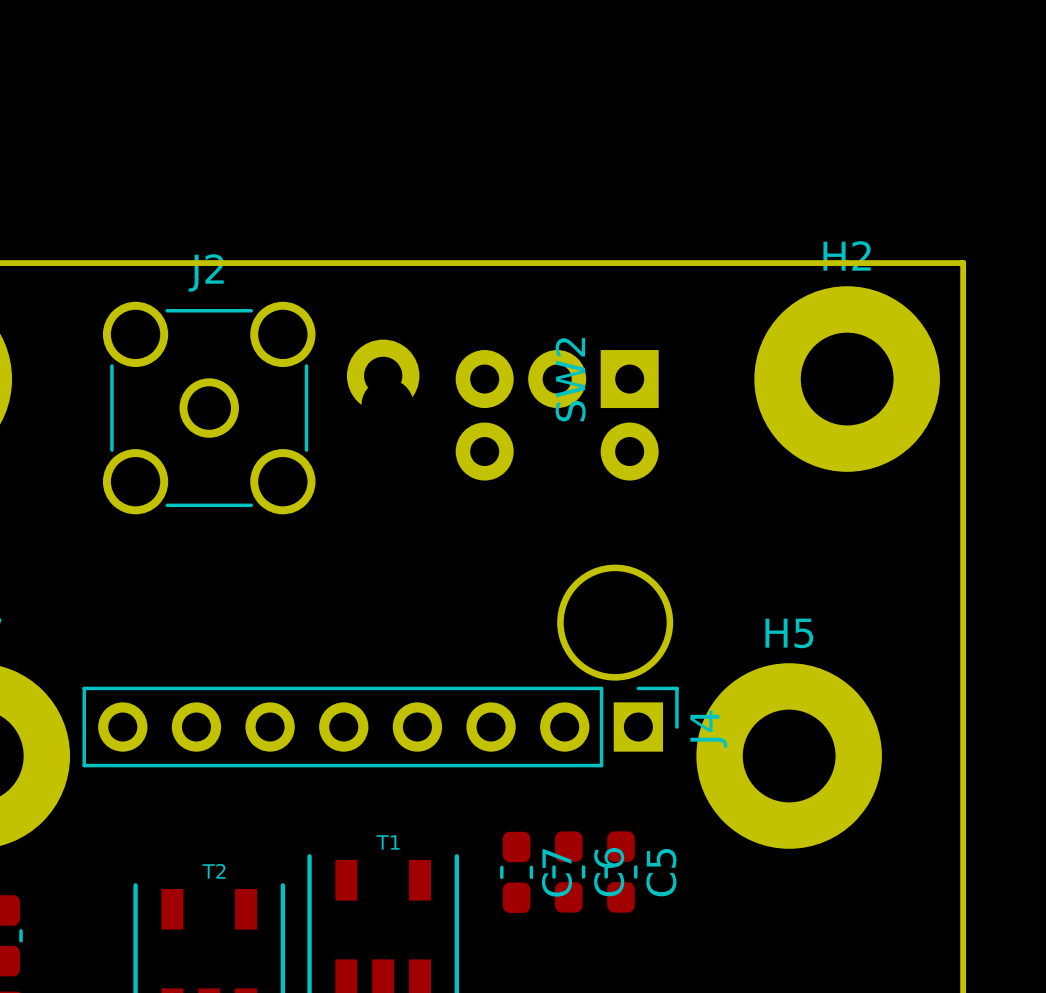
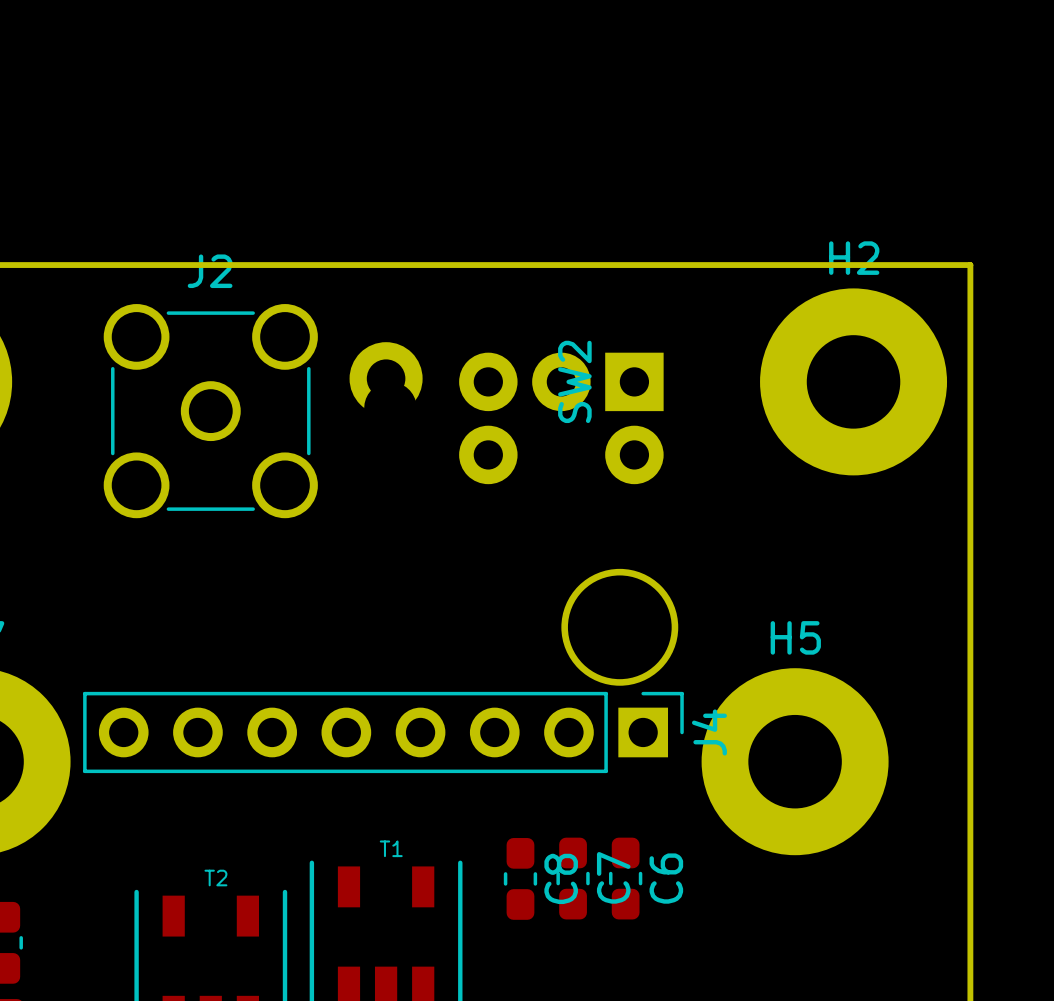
C7 name: C7 (556, 872) -> C8 (561, 878)
C6 name: C6 (609, 872) -> C7 (613, 877)
C5 name: C5 (661, 872) -> C6 (666, 878)

